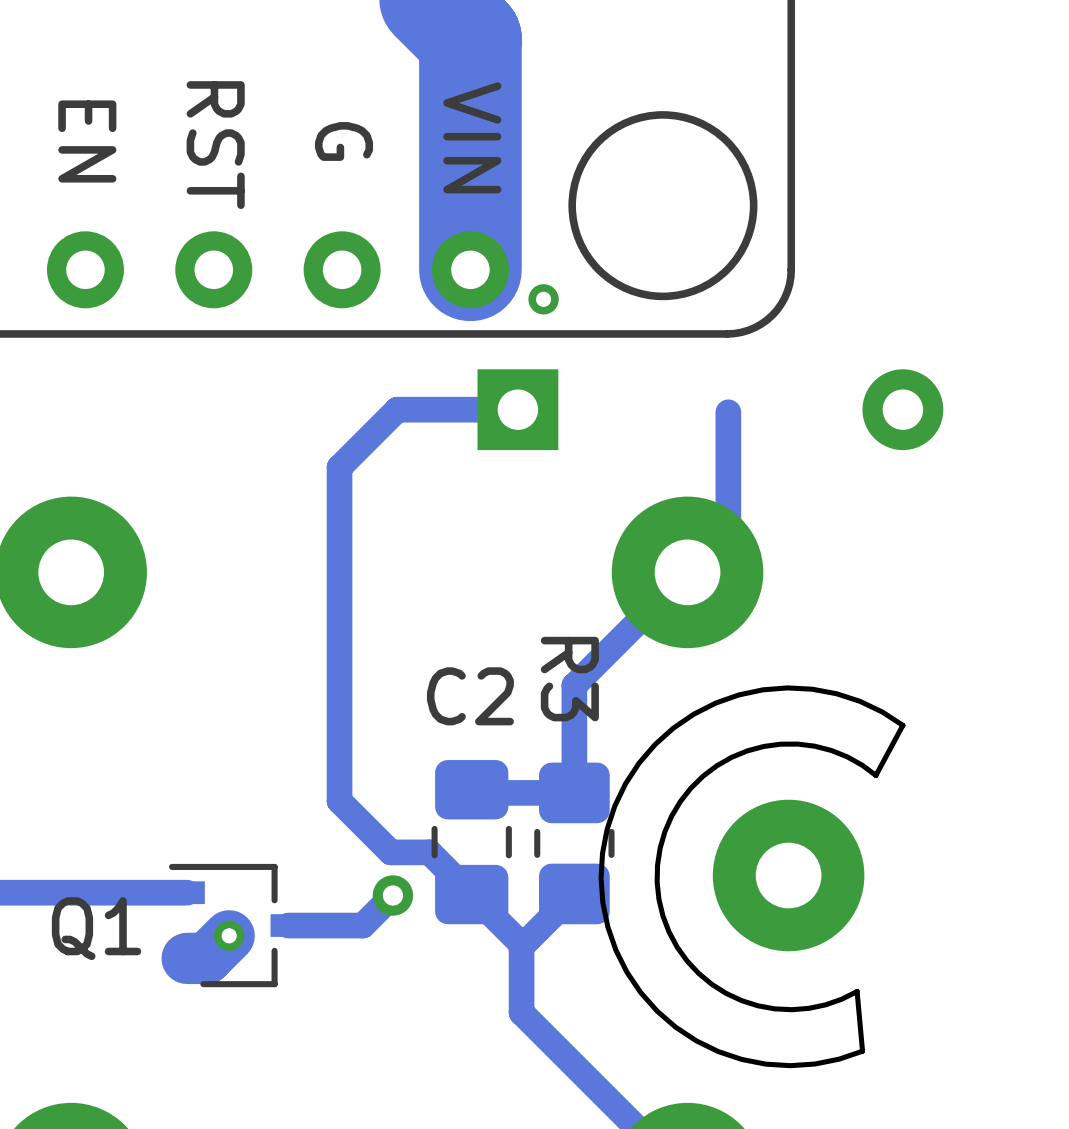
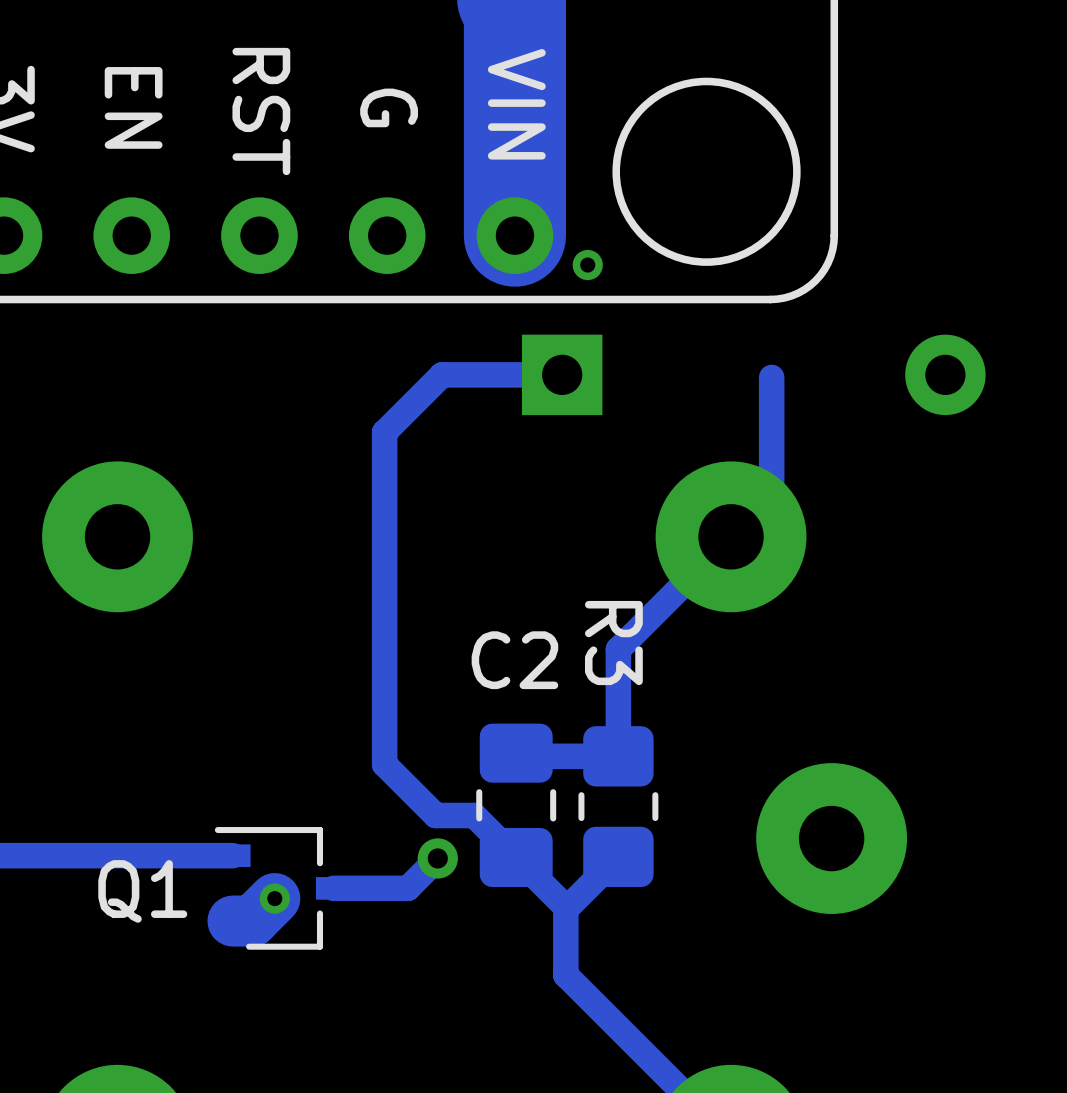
board edge: (902, 725) (875, 775) (847, 756) (814, 746) (780, 744) (747, 750) (731, 757) (703, 776) (680, 801) (664, 831) (657, 865) (658, 899) (669, 931) (677, 946) (698, 973) (726, 993) (758, 1005) (774, 1008) (808, 1008) (825, 1004) (857, 991) (862, 1051) (839, 1059) (815, 1064) (790, 1065) (765, 1064) (741, 1059) (718, 1051) (696, 1040) (675, 1027) (657, 1011) (640, 992) (626, 972) (615, 950) (607, 926) (602, 902) (601, 878) (602, 853) (607, 829) (614, 805) (625, 783) (639, 763) (655, 744) (673, 728) (693, 714) (715, 703) (739, 694) (763, 689) (787, 687) (812, 689) (836, 693) (859, 701) (882, 711) (902, 725) -> none

